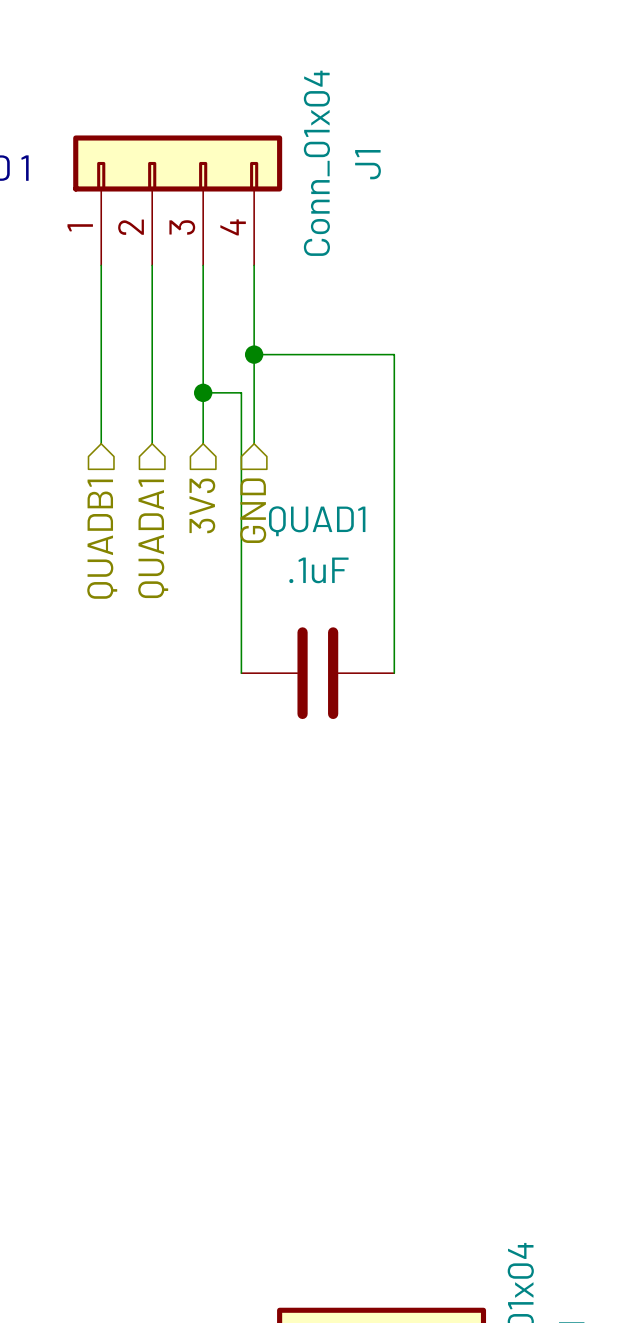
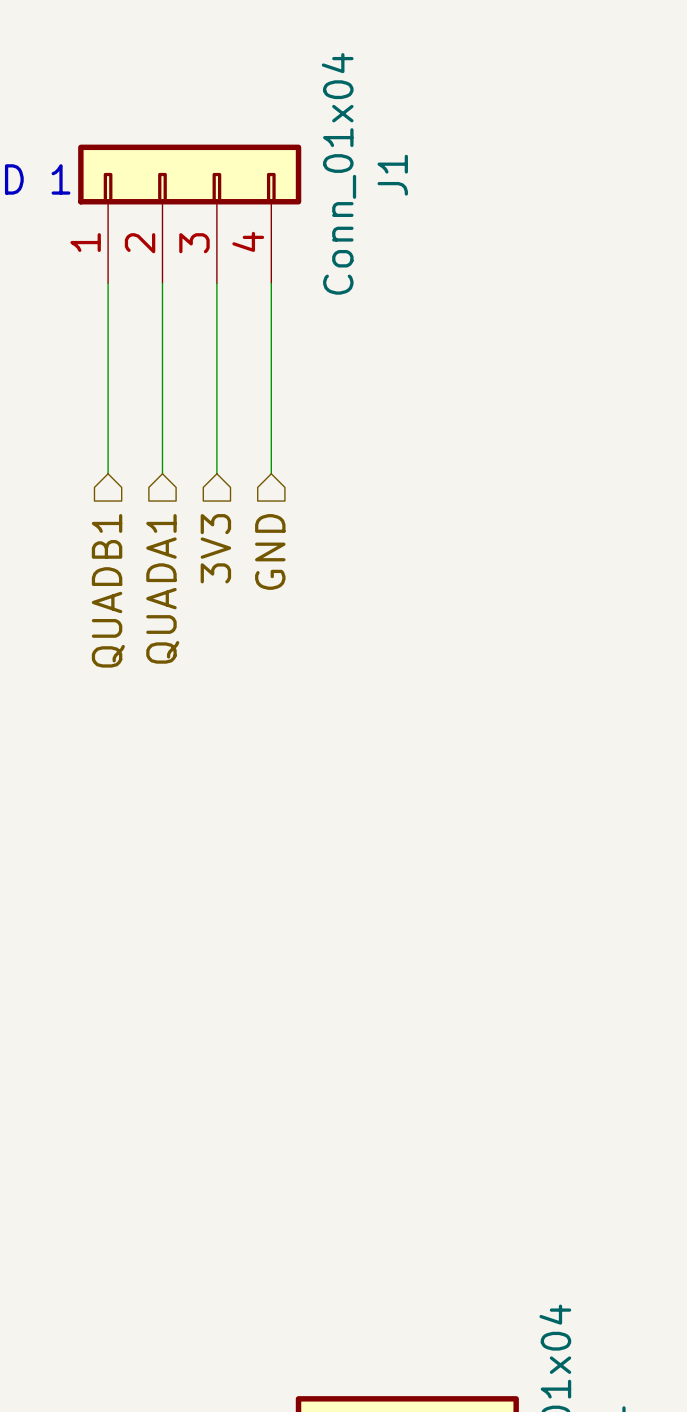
wire: (254, 354) (394, 354) (394, 673) -> none
junction: (254, 354) -> none
wire: (203, 392) (241, 392) (241, 673) -> none
junction: (203, 392) -> none
QUAD1: .1uF (317, 673) -> none

